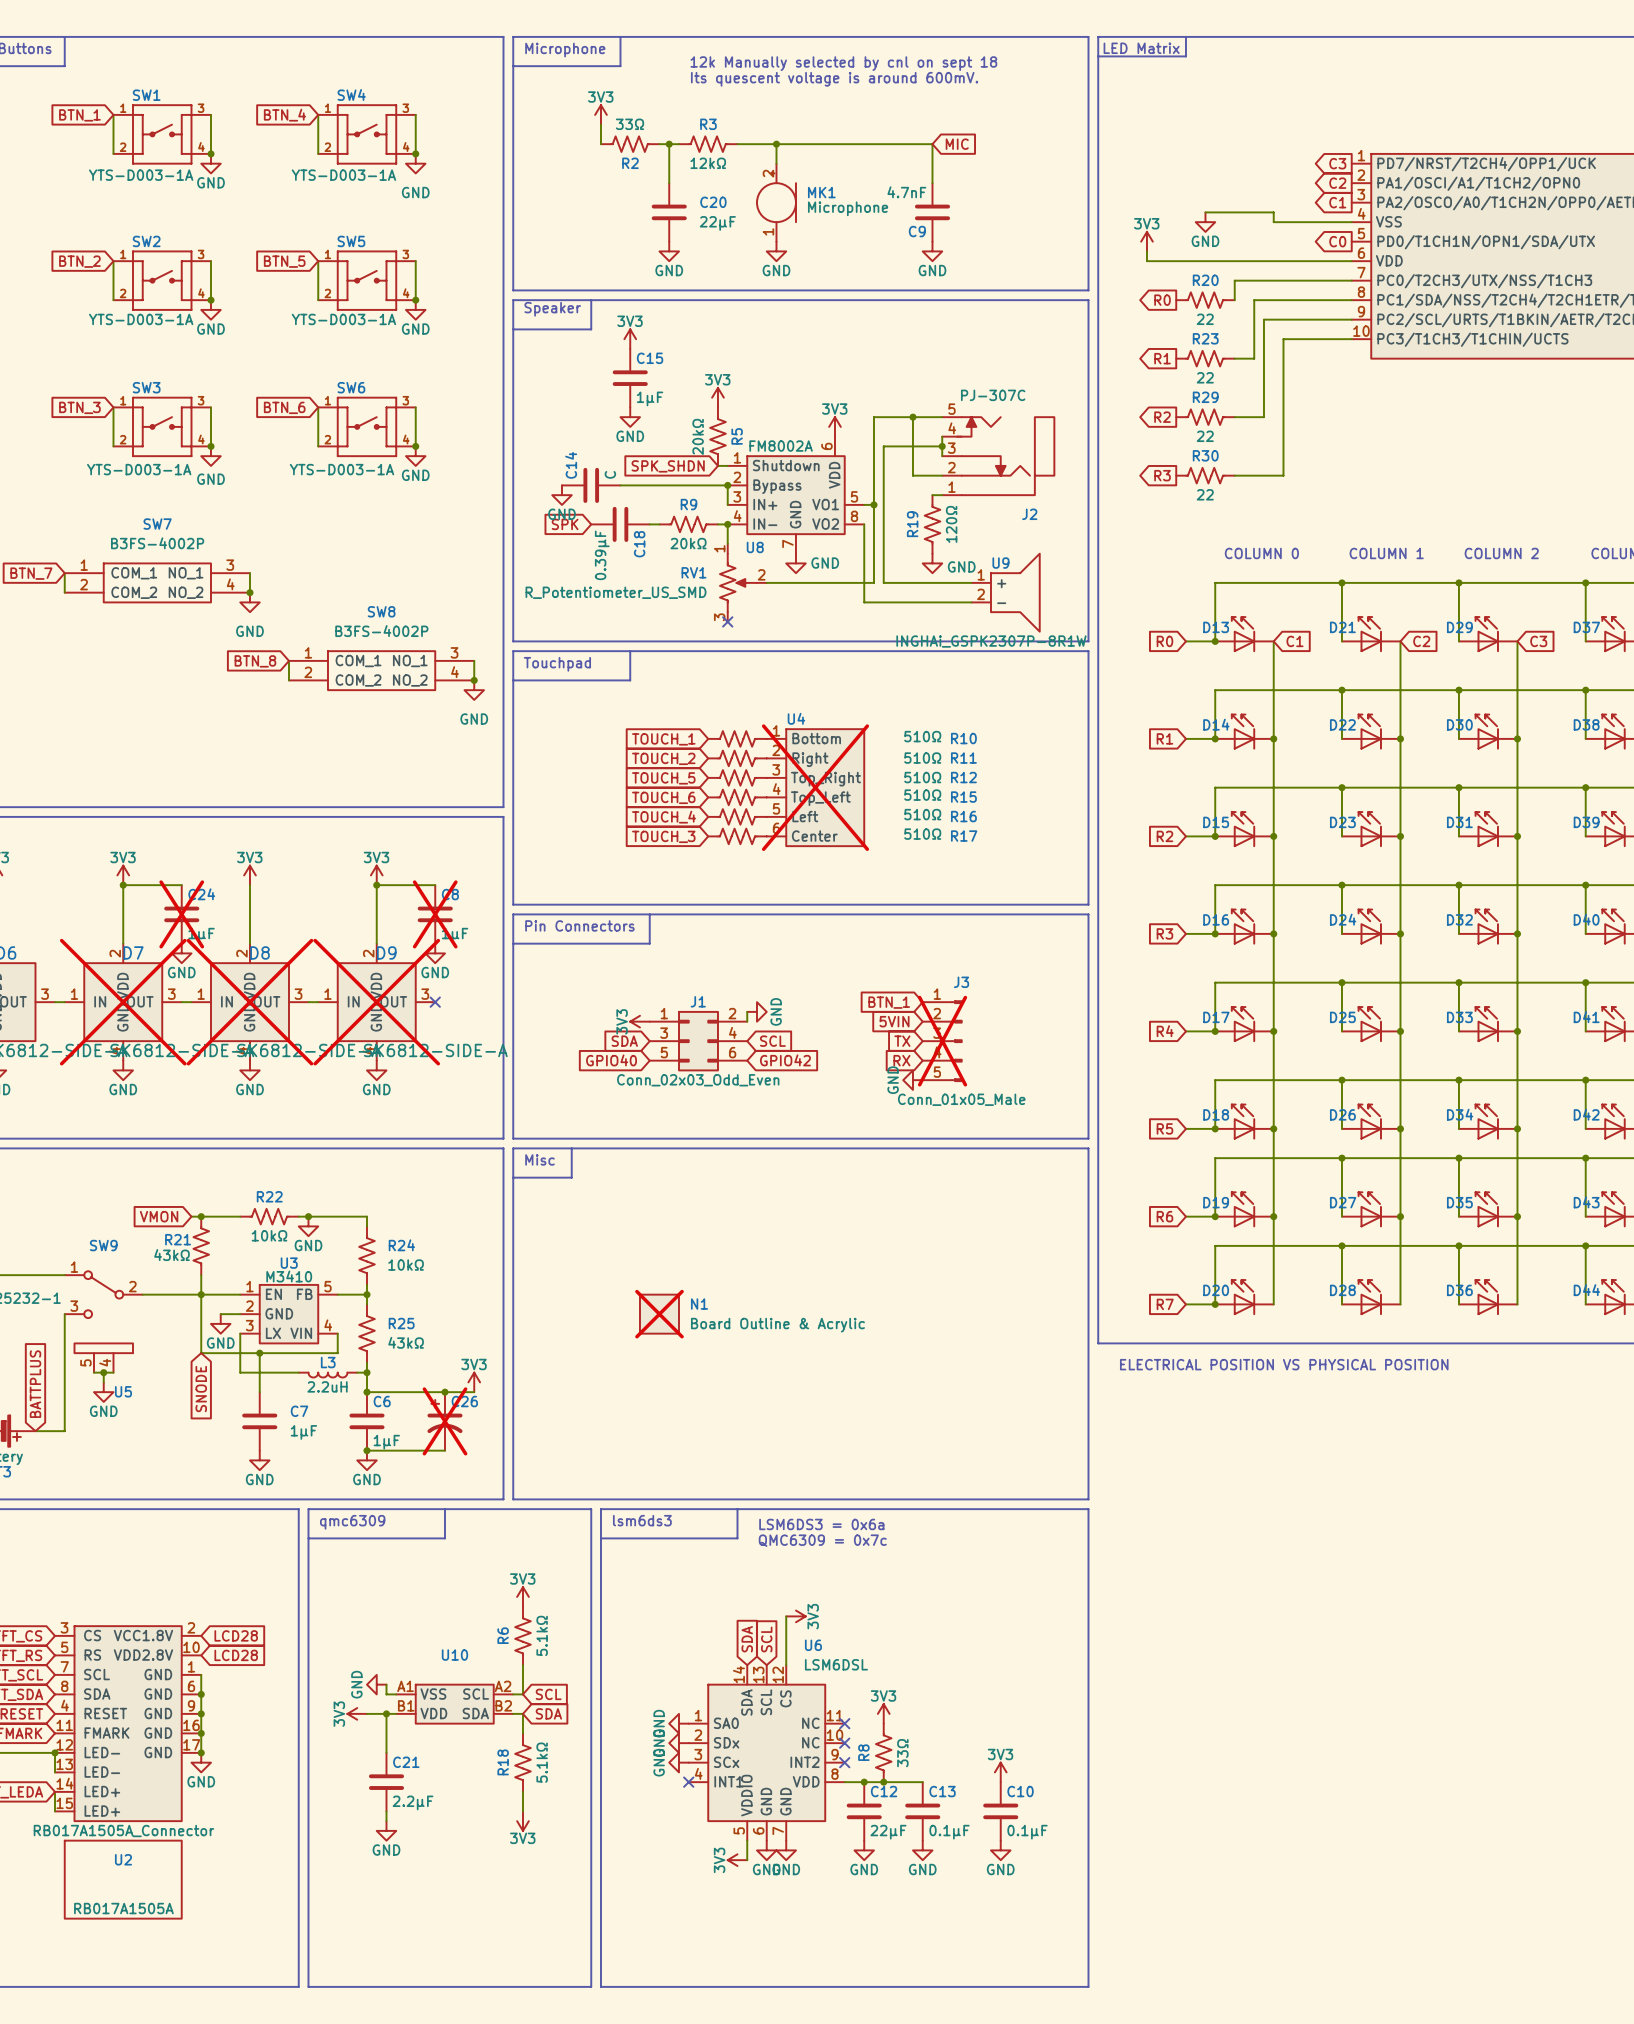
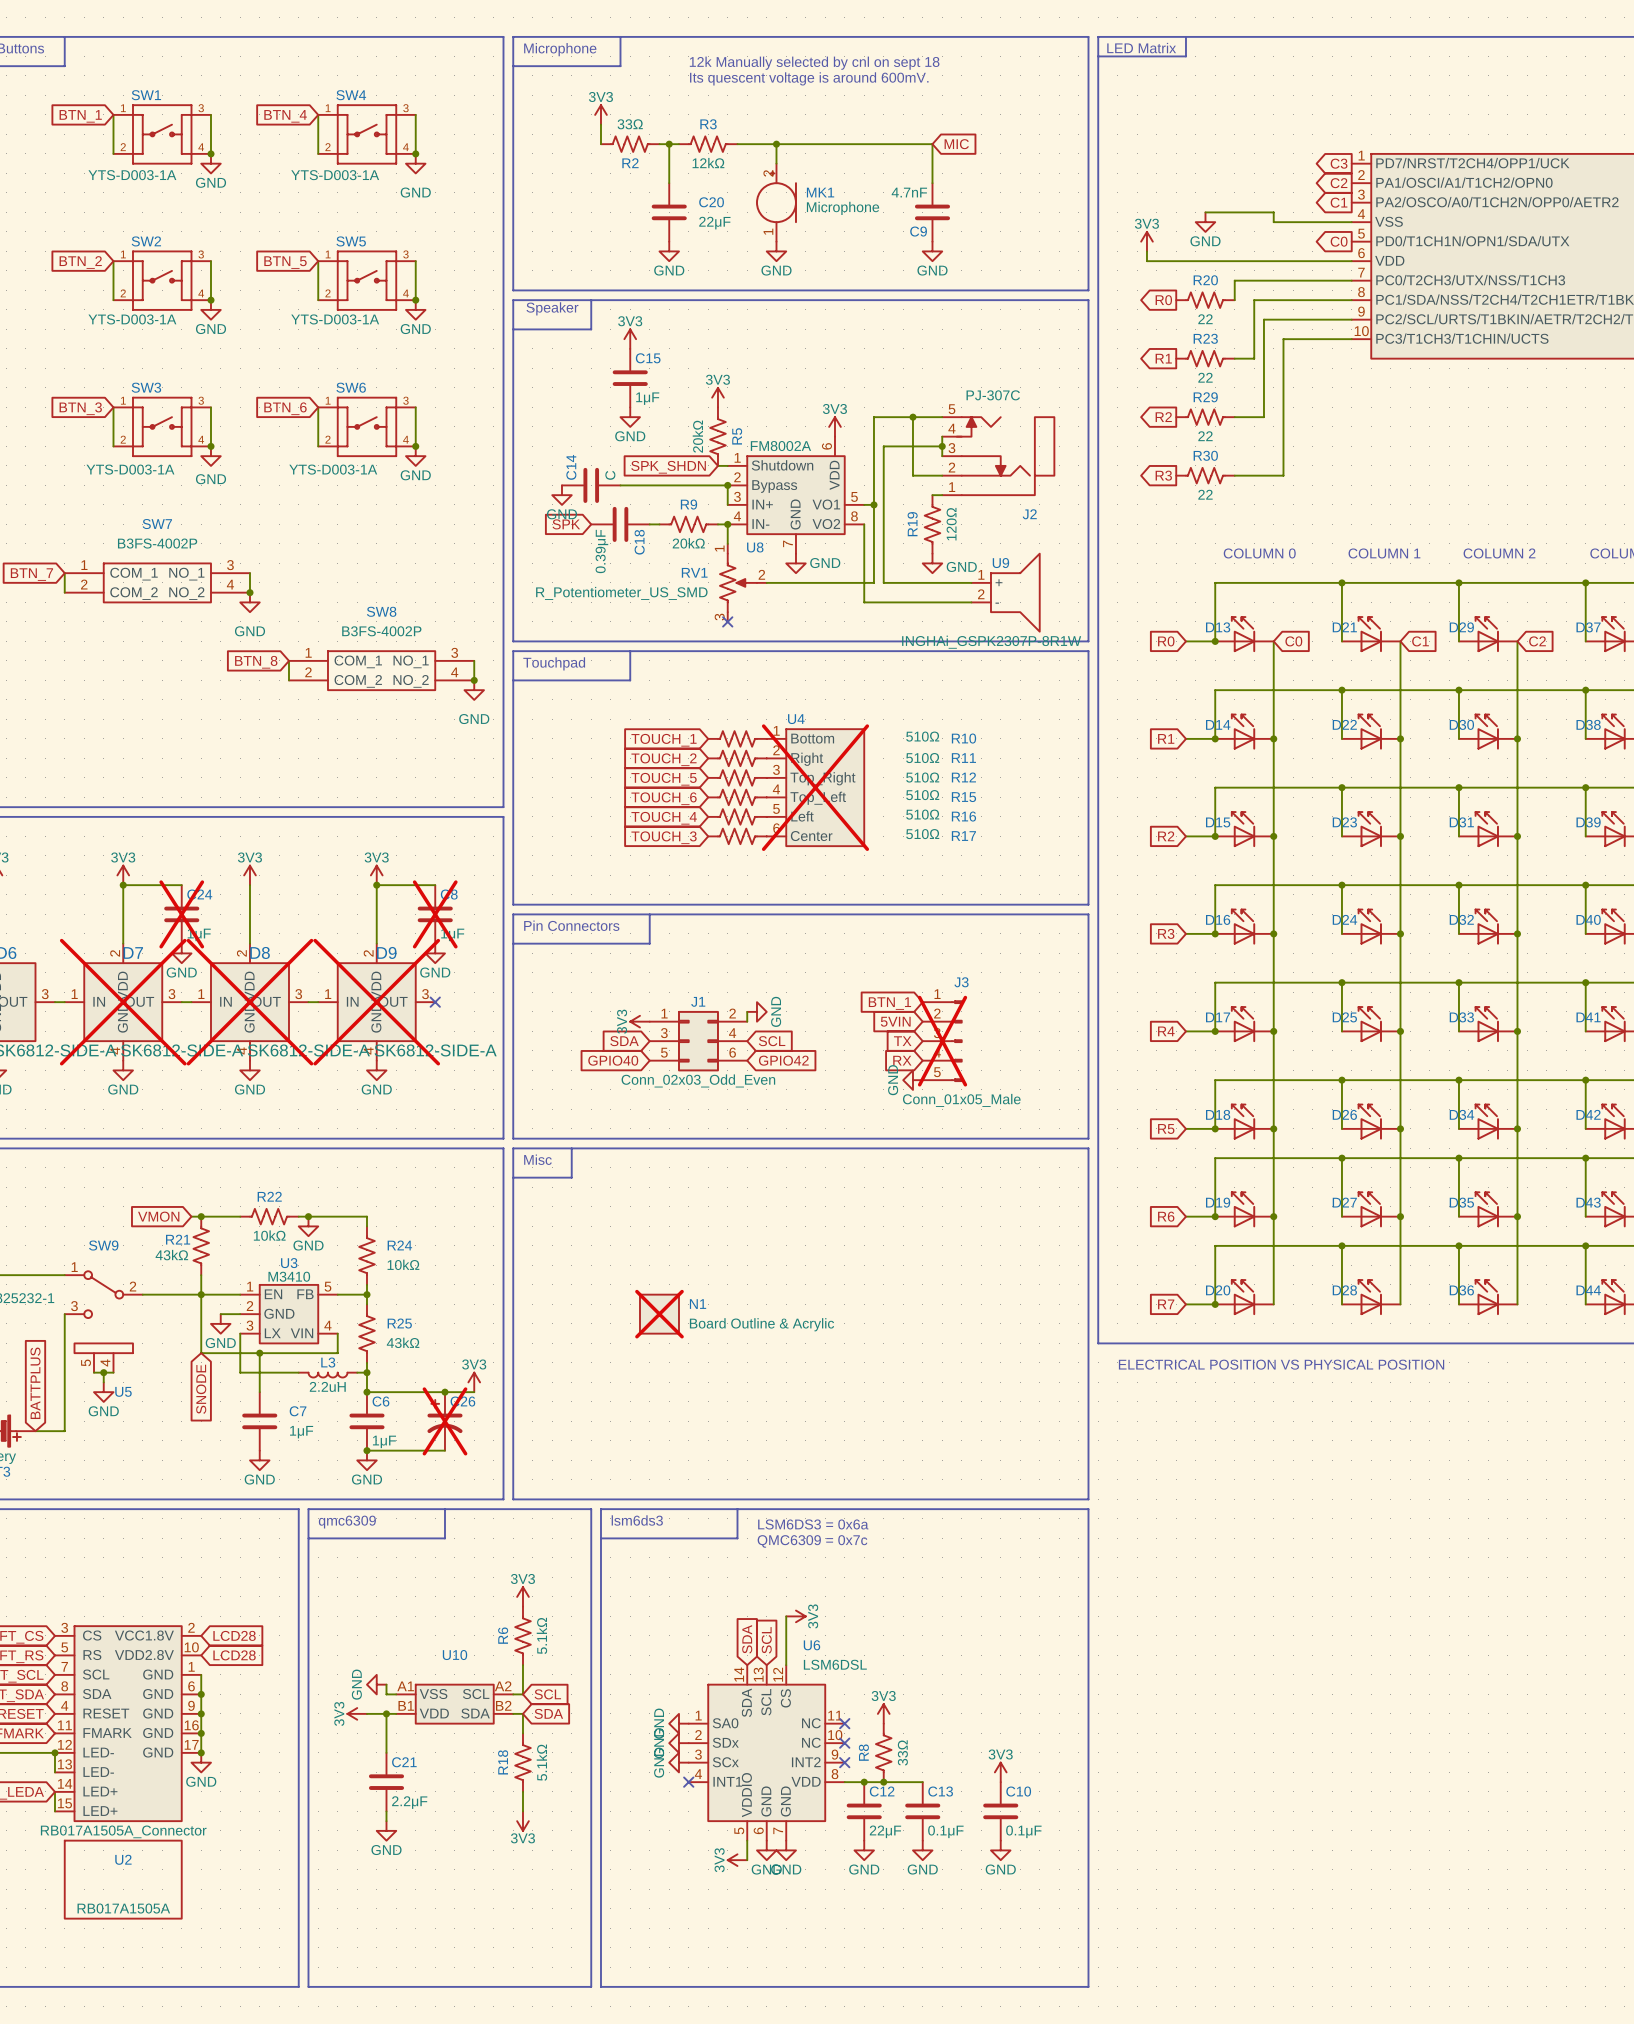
global label: C1 (1294, 641) -> C0 (1293, 641)
global label: C2 (1421, 641) -> C1 (1420, 641)
global label: C3 (1538, 641) -> C2 (1537, 641)

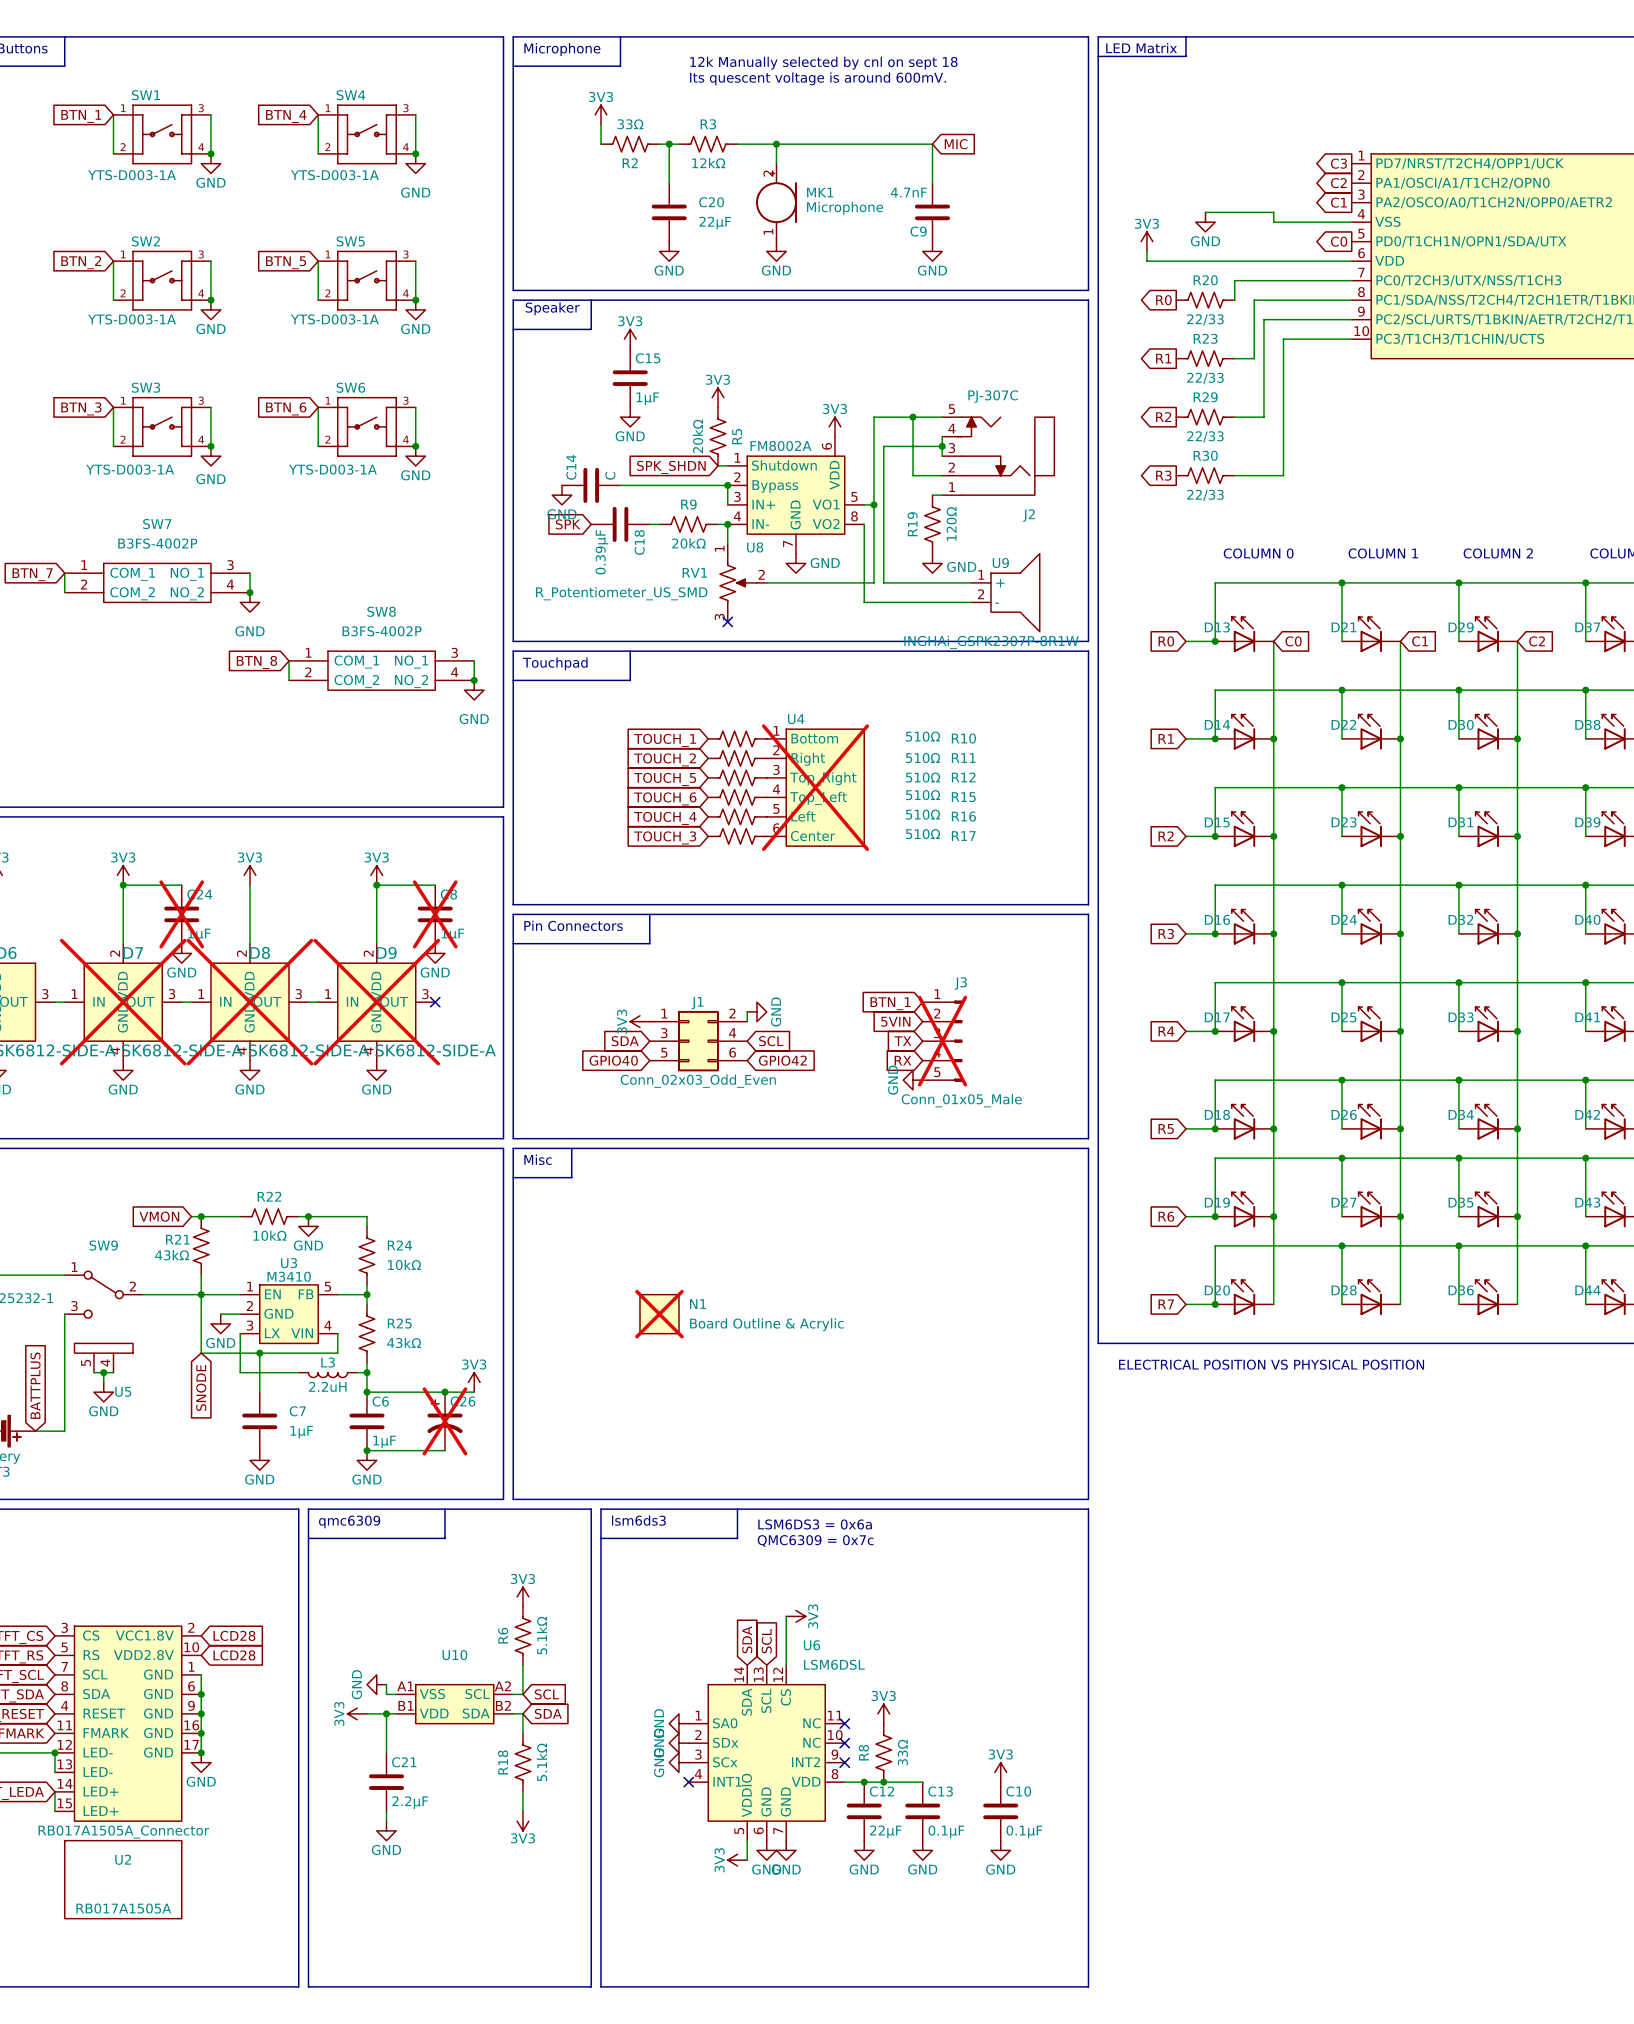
R20 value: 22 (1205, 319) -> 22/33 (1205, 319)
R23 value: 22 (1205, 377) -> 22/33 (1205, 378)
R29 value: 22 (1205, 436) -> 22/33 (1205, 436)
R30 value: 22 (1205, 494) -> 22/33 (1205, 495)

